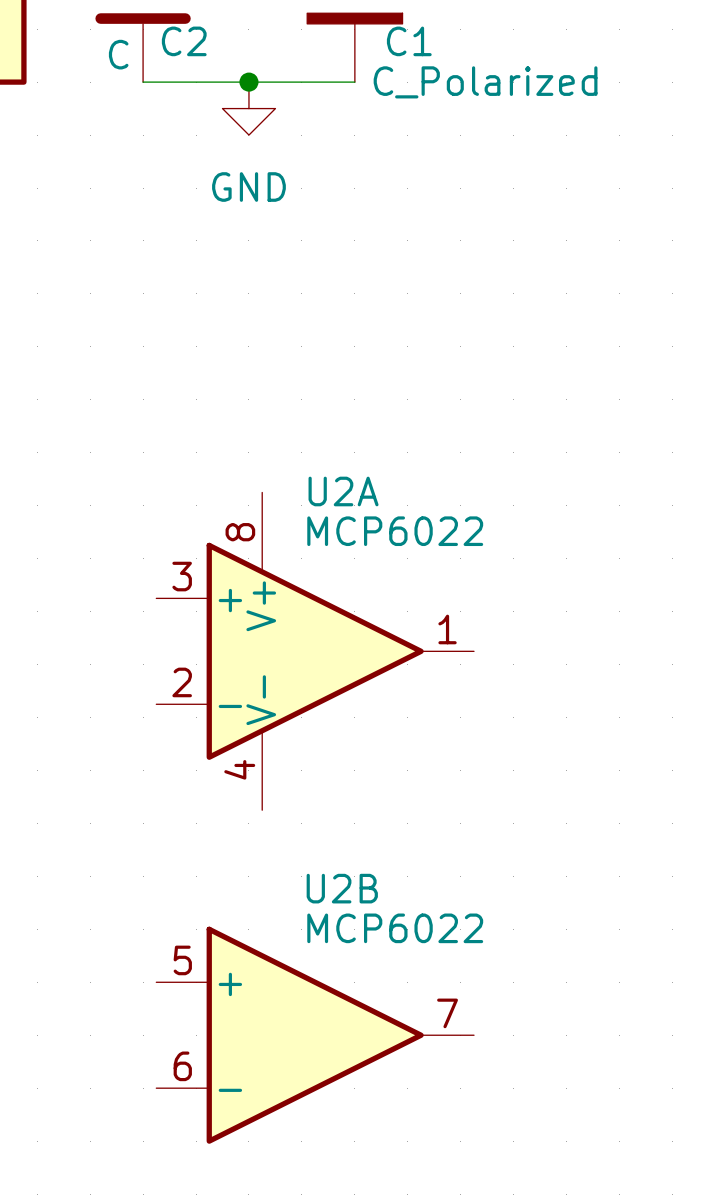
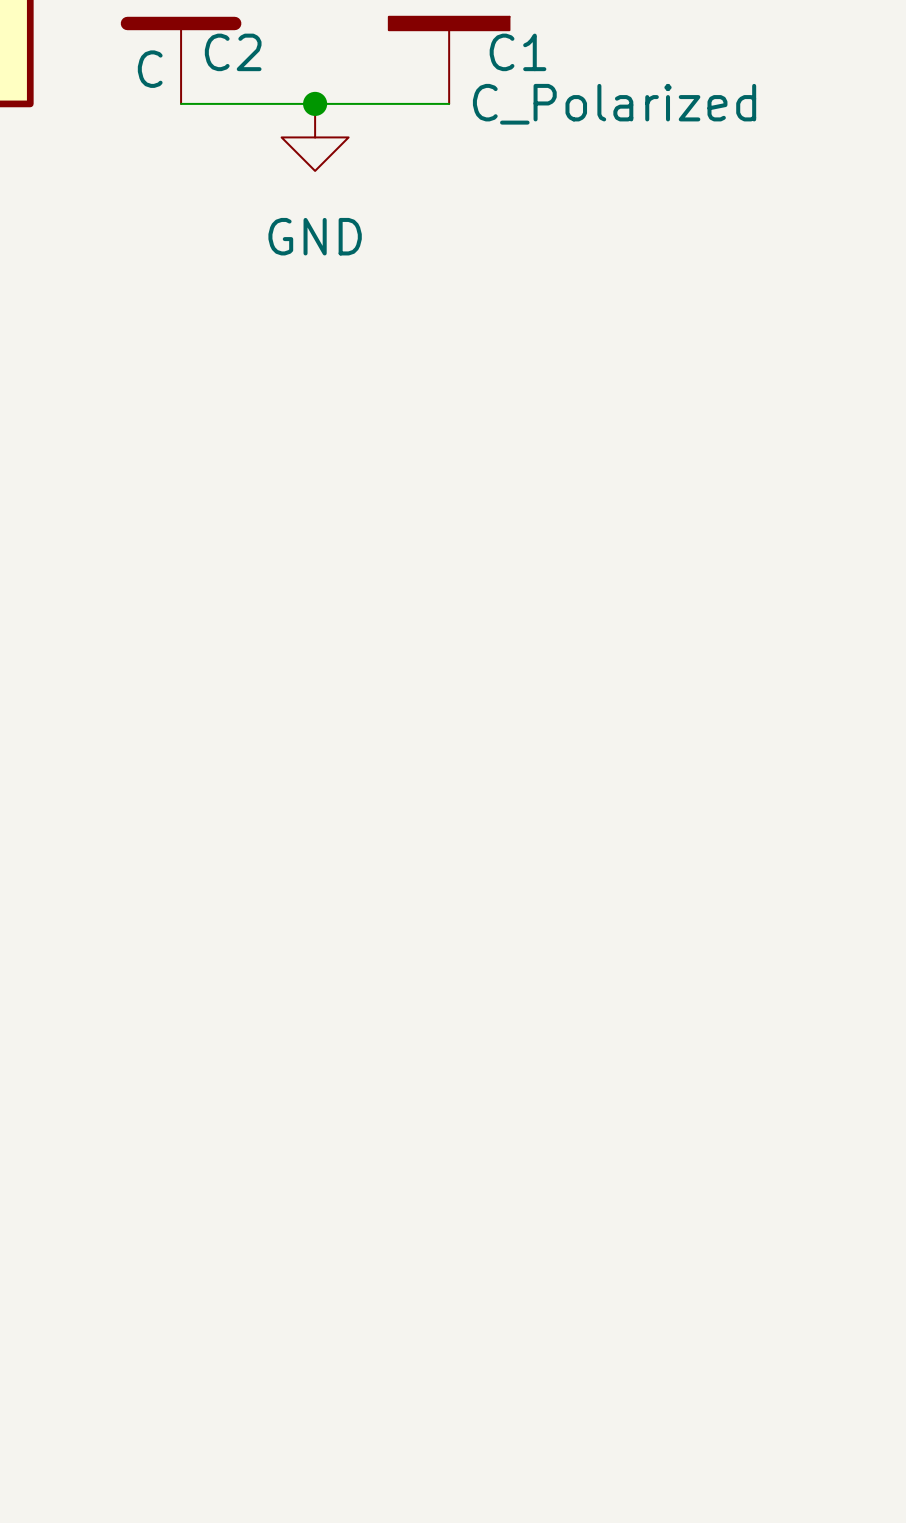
part: (262, 651) -> none
U2A: MCP6022 (315, 651) -> none
U2B: MCP6022 (315, 1035) -> none

